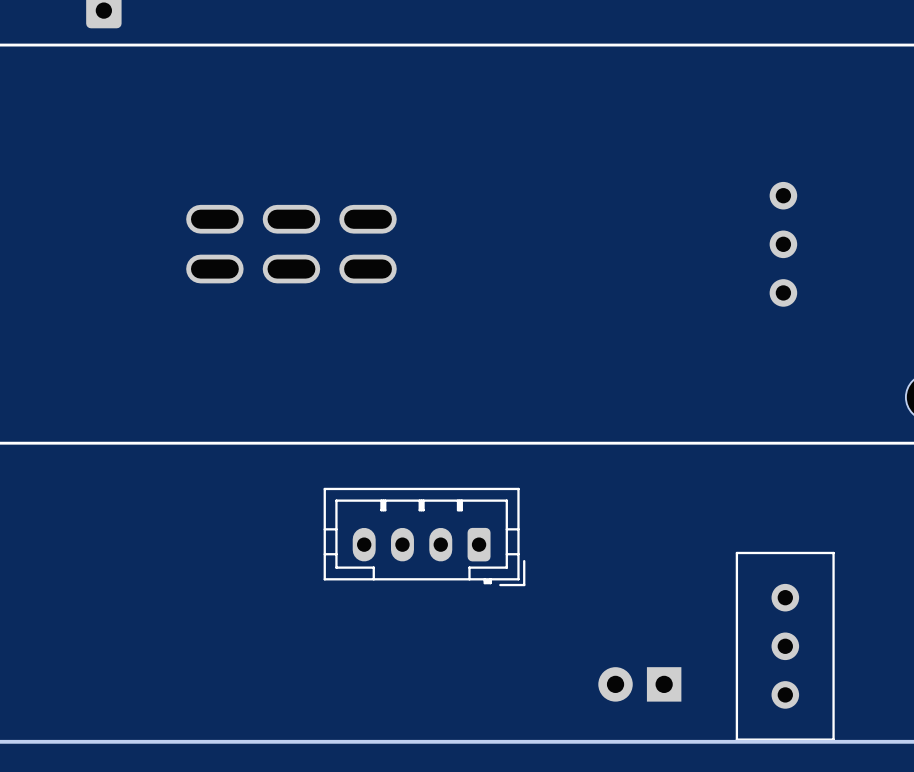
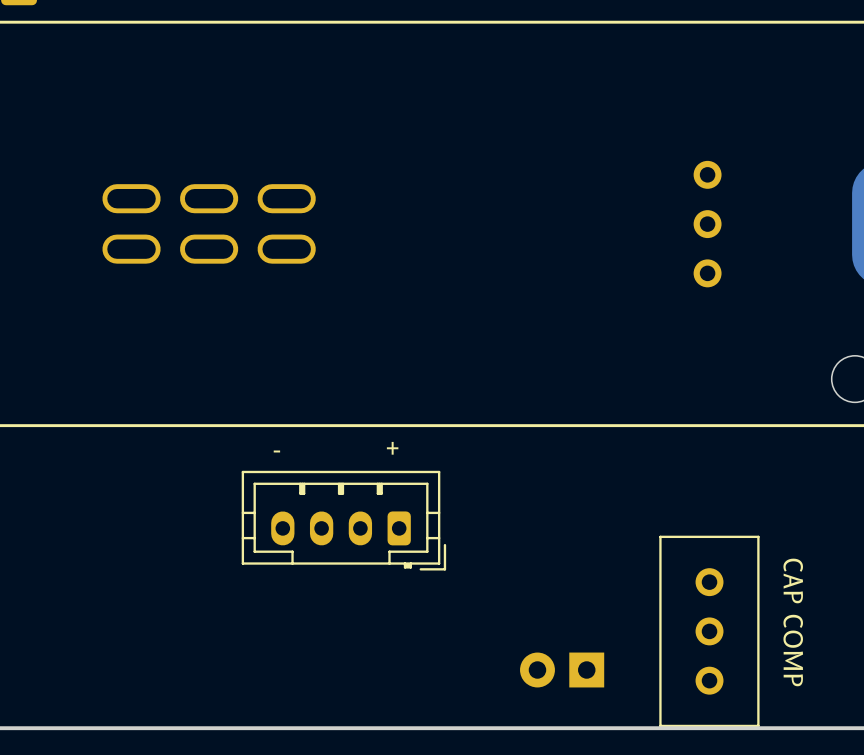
text: none -> + (392, 448)
text: none -> - (276, 451)
text: none -> CAP COMP (793, 622)

